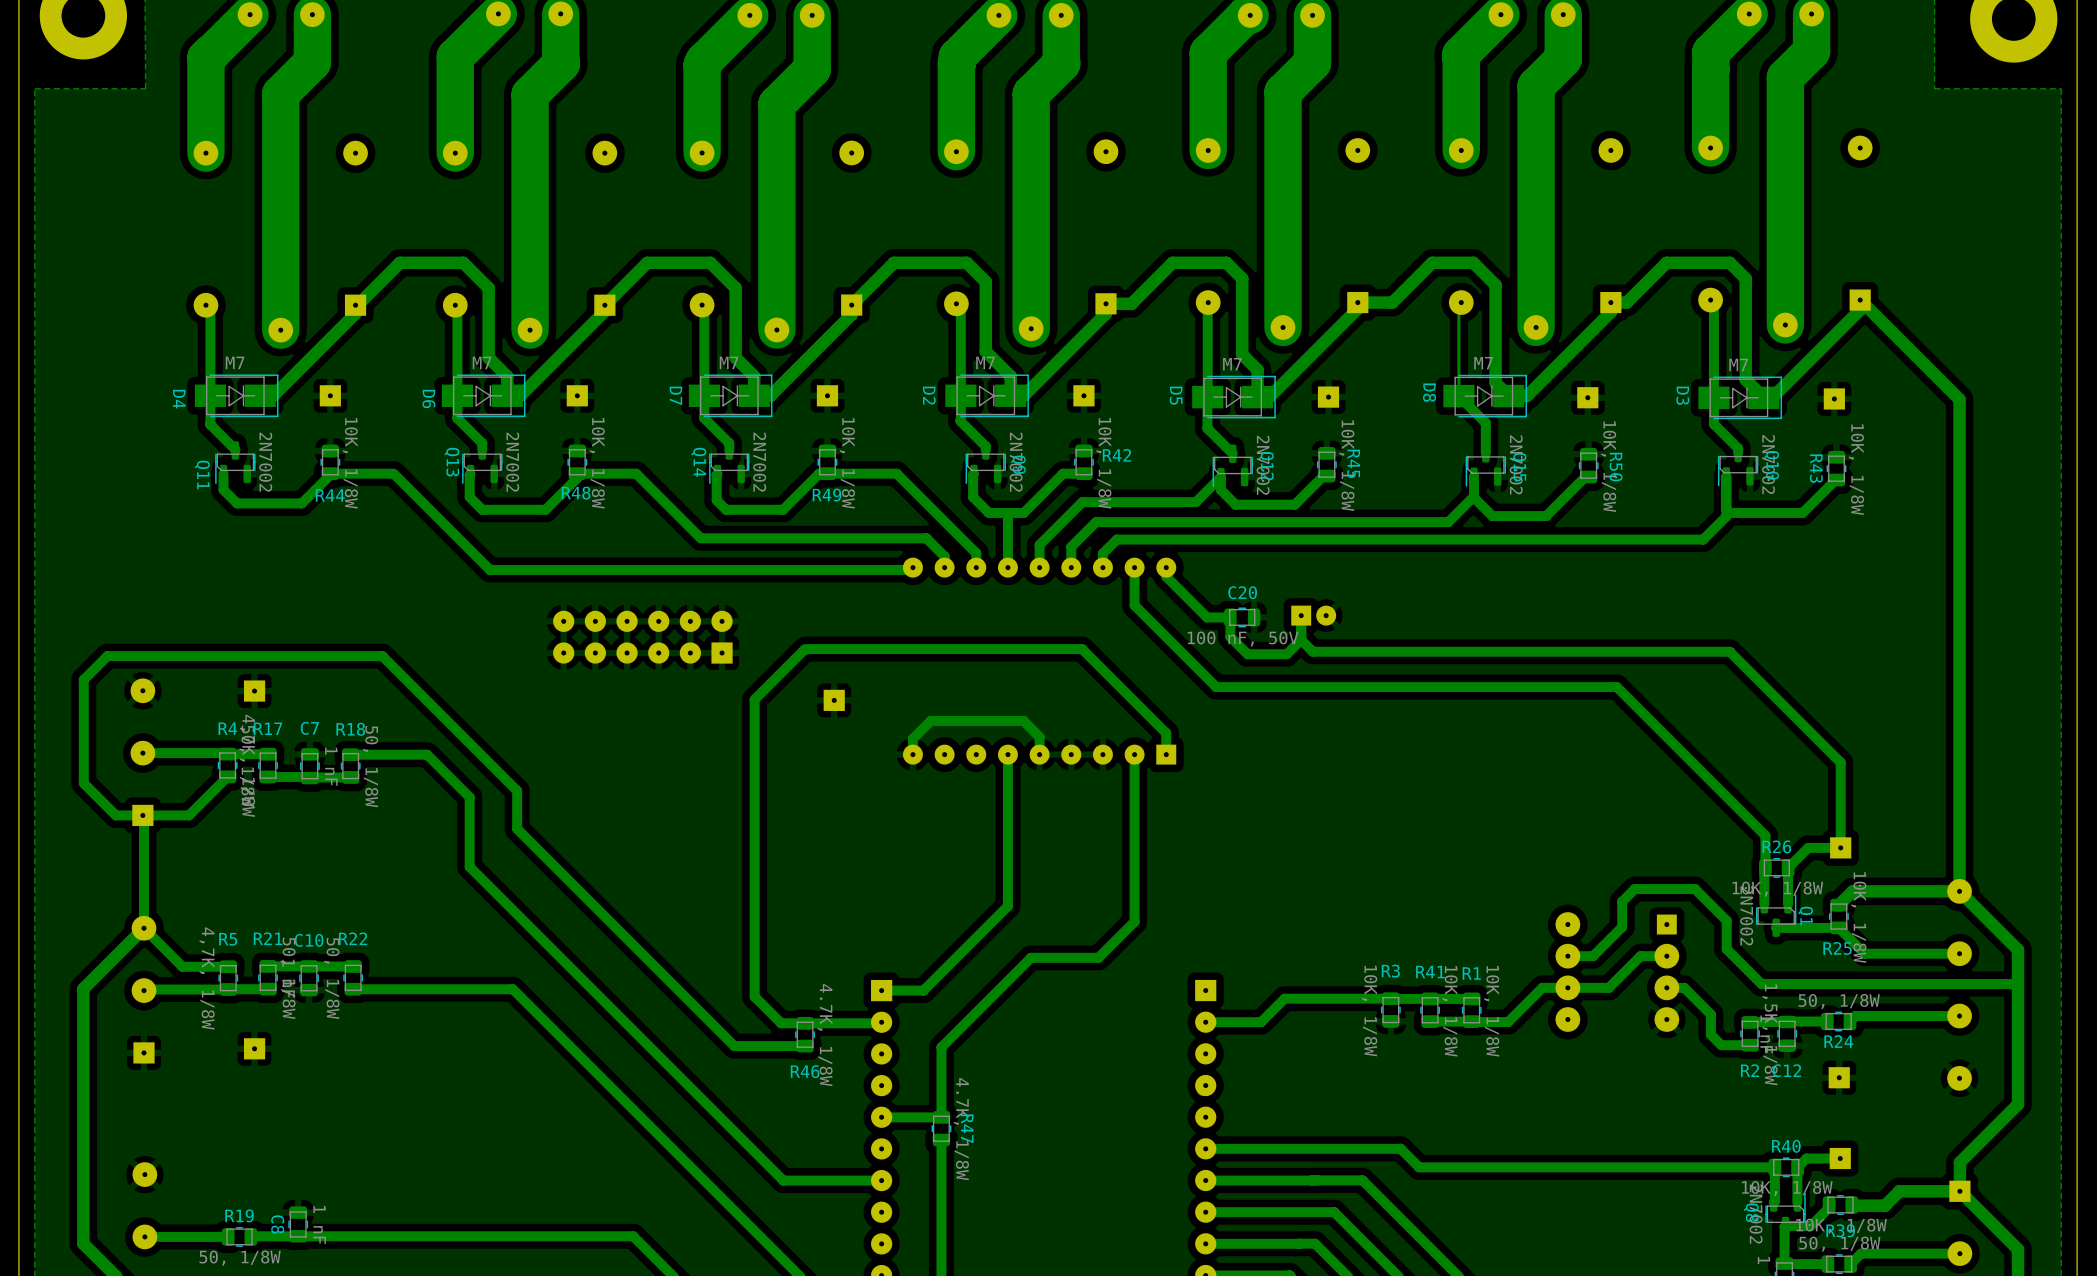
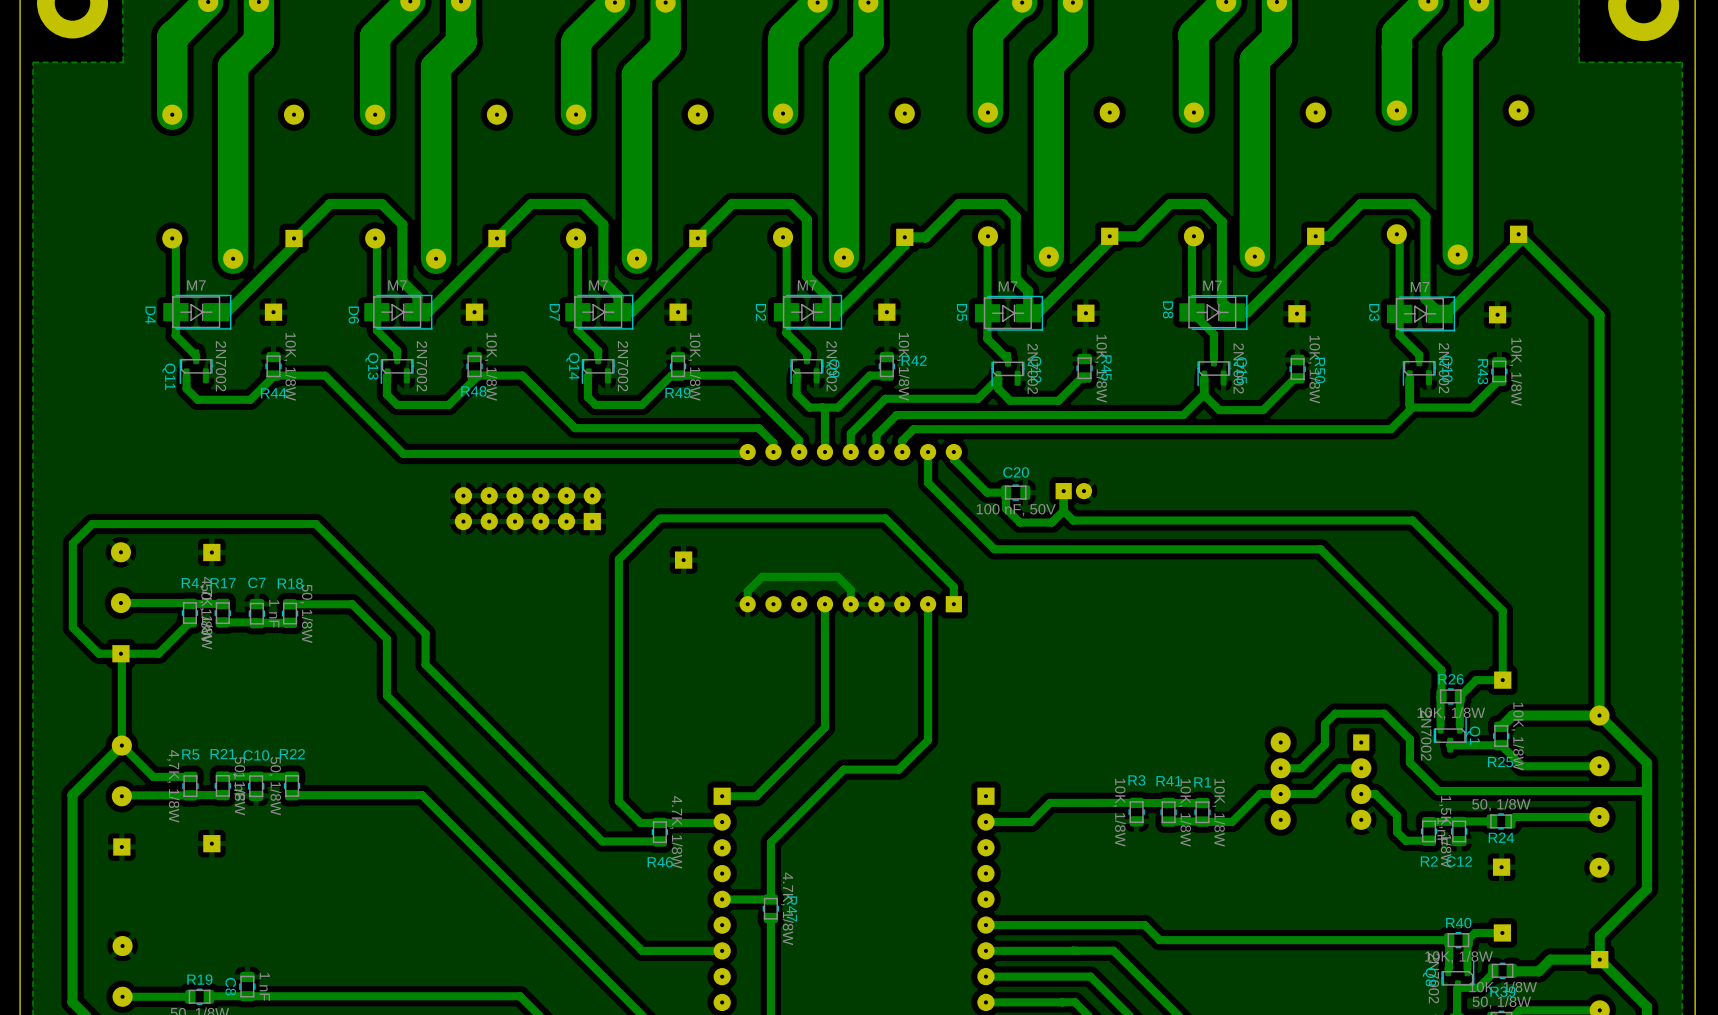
track width: thin (1461, 302) (1458, 304) (1458, 396) -> thick (1193, 236) (1192, 238) (1192, 312)

